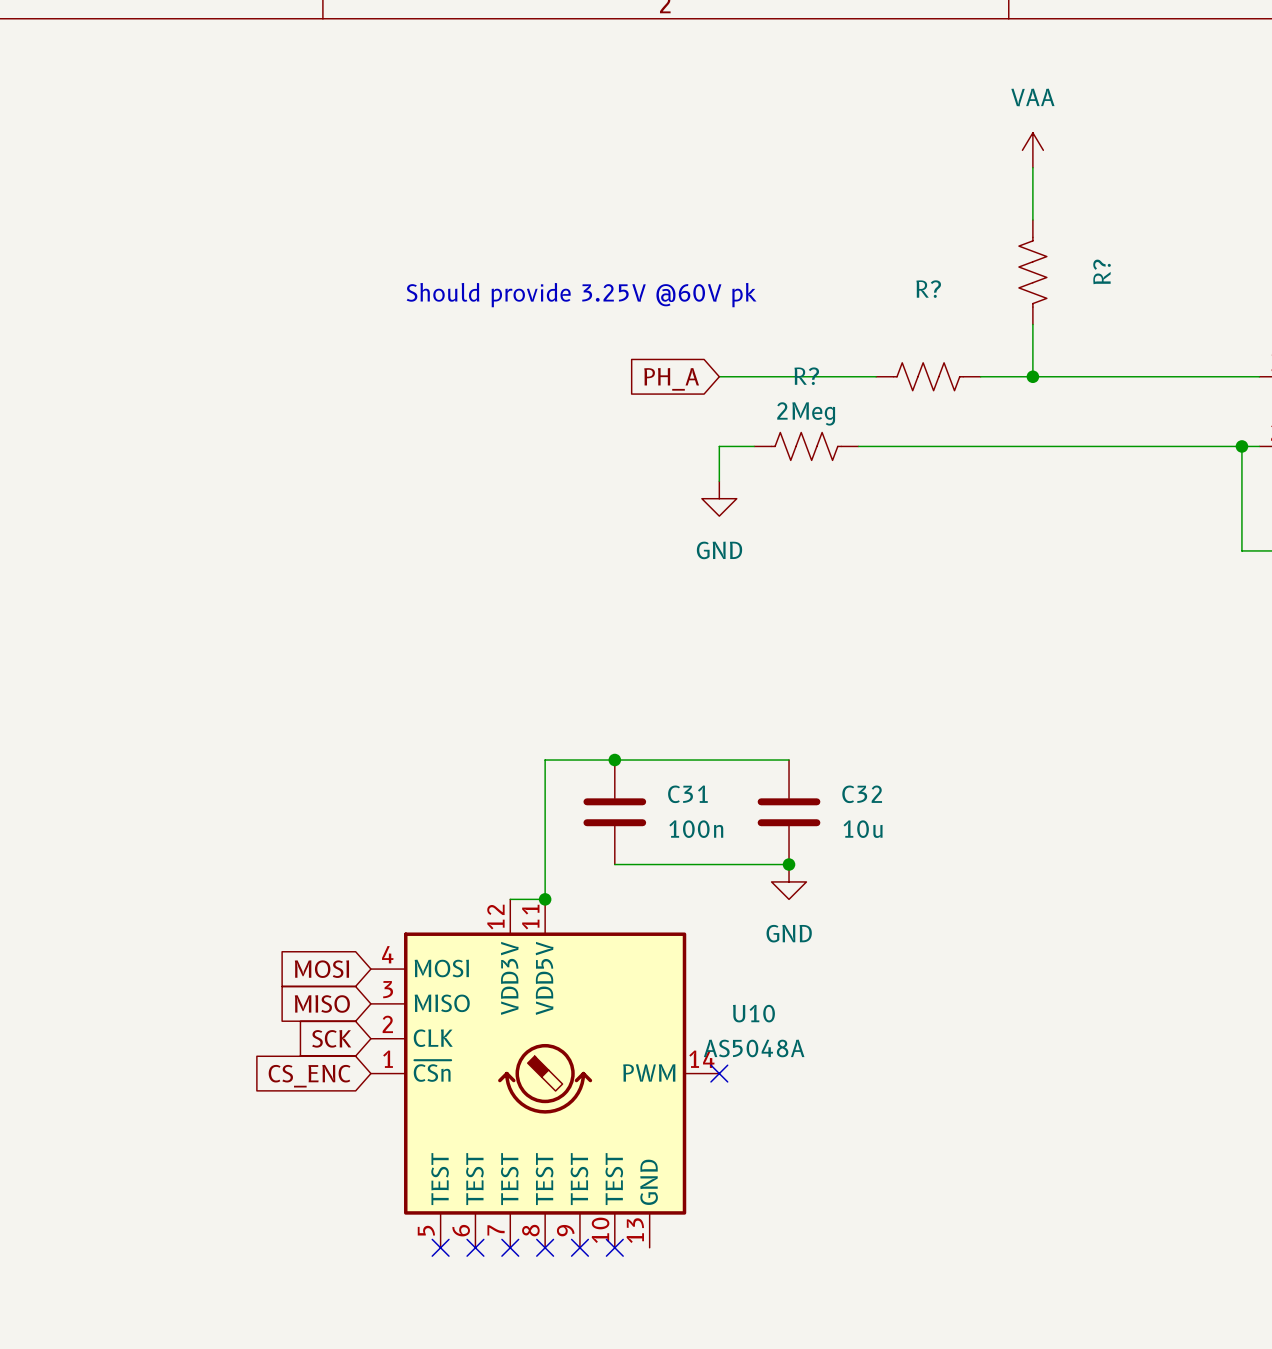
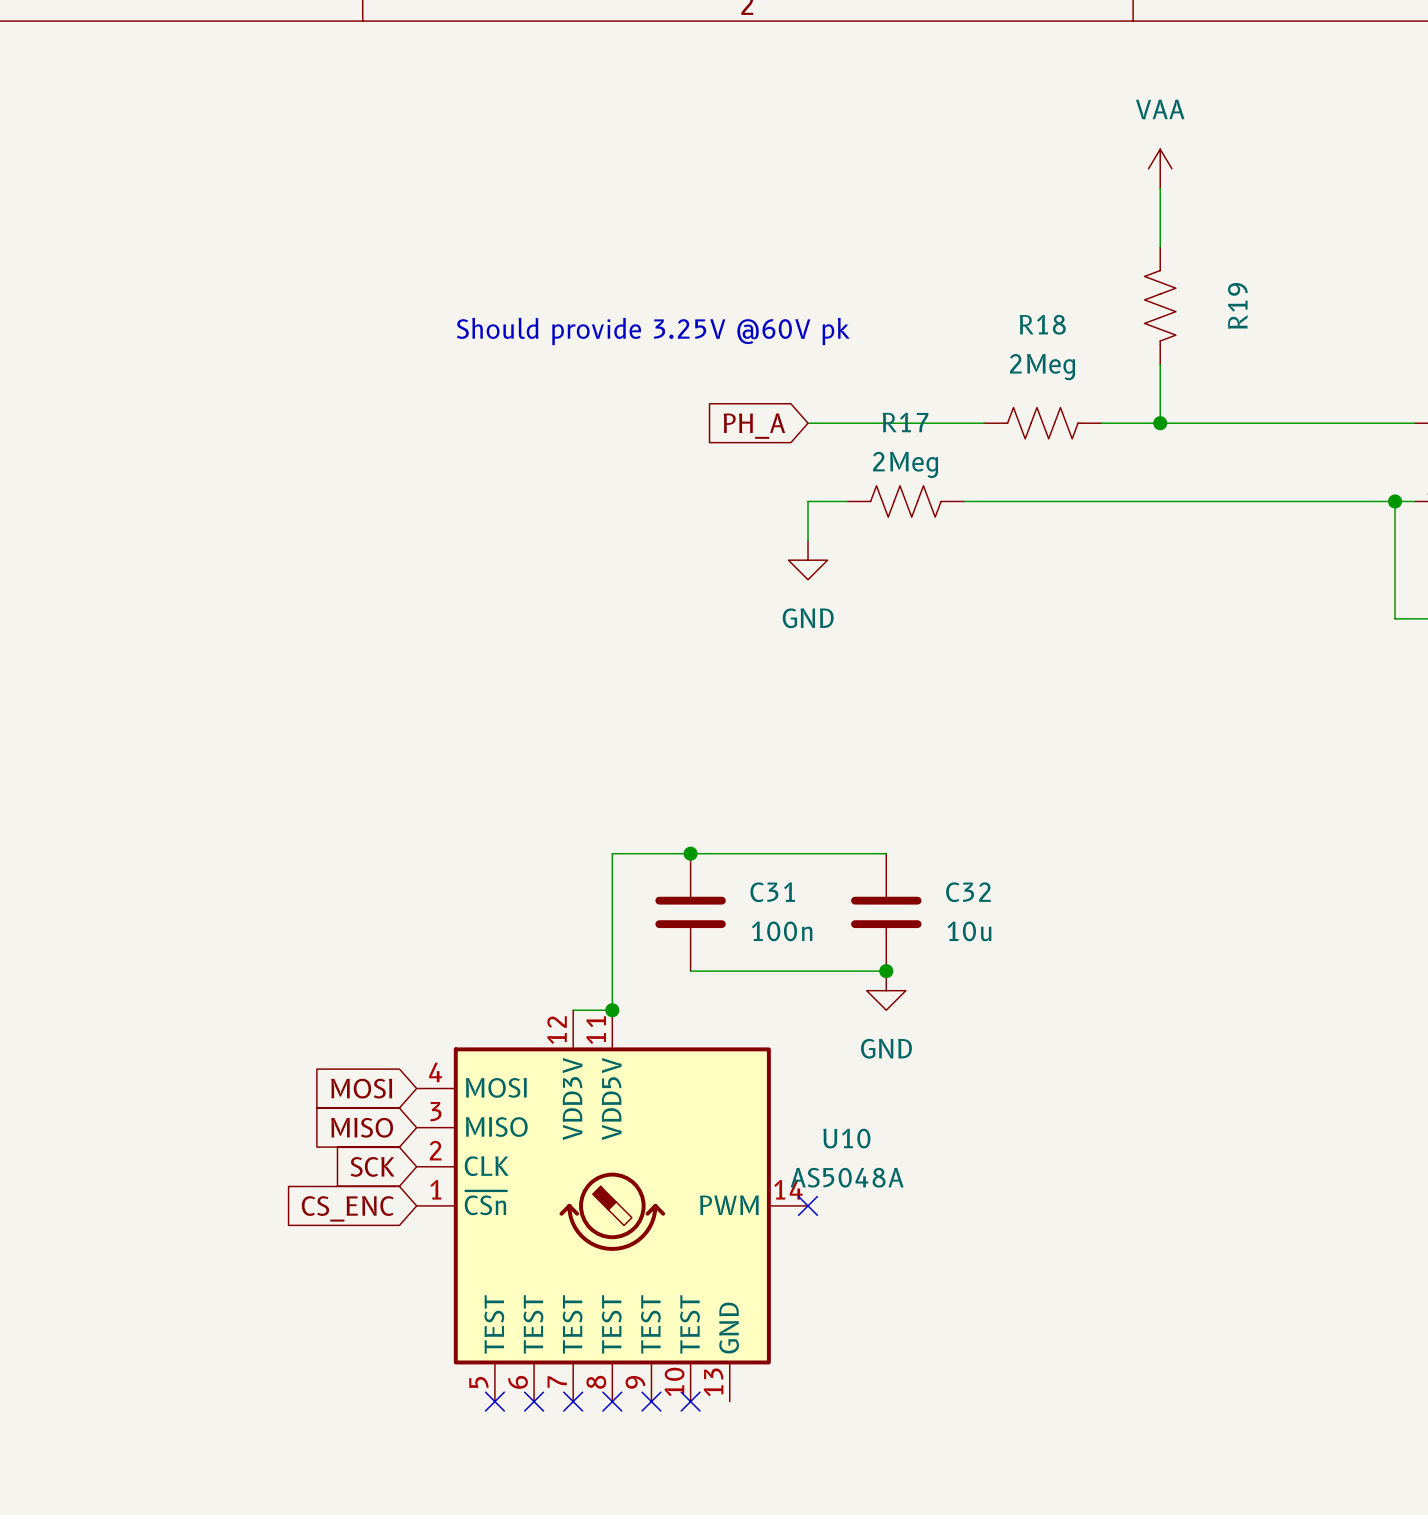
R? name: R? (1102, 271) -> R19 (1237, 305)
R? name: R? (928, 289) -> R18 (1042, 324)
R? value: none -> 2Meg (1042, 367)
R? name: R? (806, 376) -> R17 (905, 422)

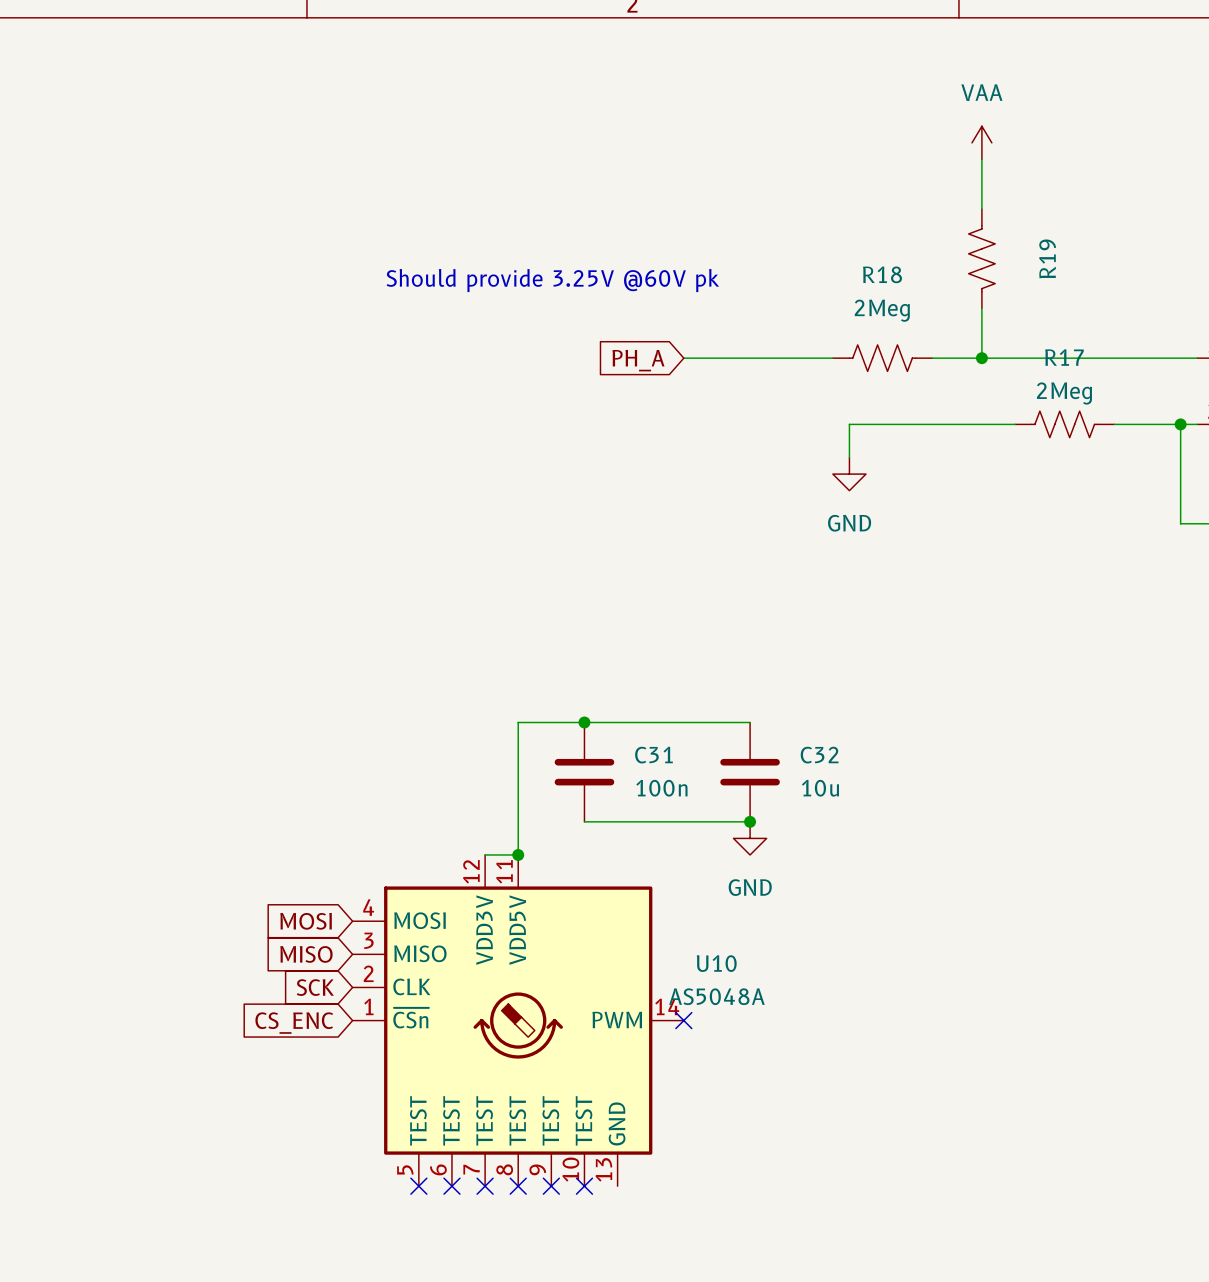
wire: (847, 501) (808, 501) (808, 540) -> none
R17 position: (905, 501) -> (1064, 424)
wire: (964, 501) (1003, 501) -> (849, 457) (849, 424)
wire: (1199, 501) (1316, 501) -> none
power symbol position: GND (808, 560) -> GND (849, 474)

